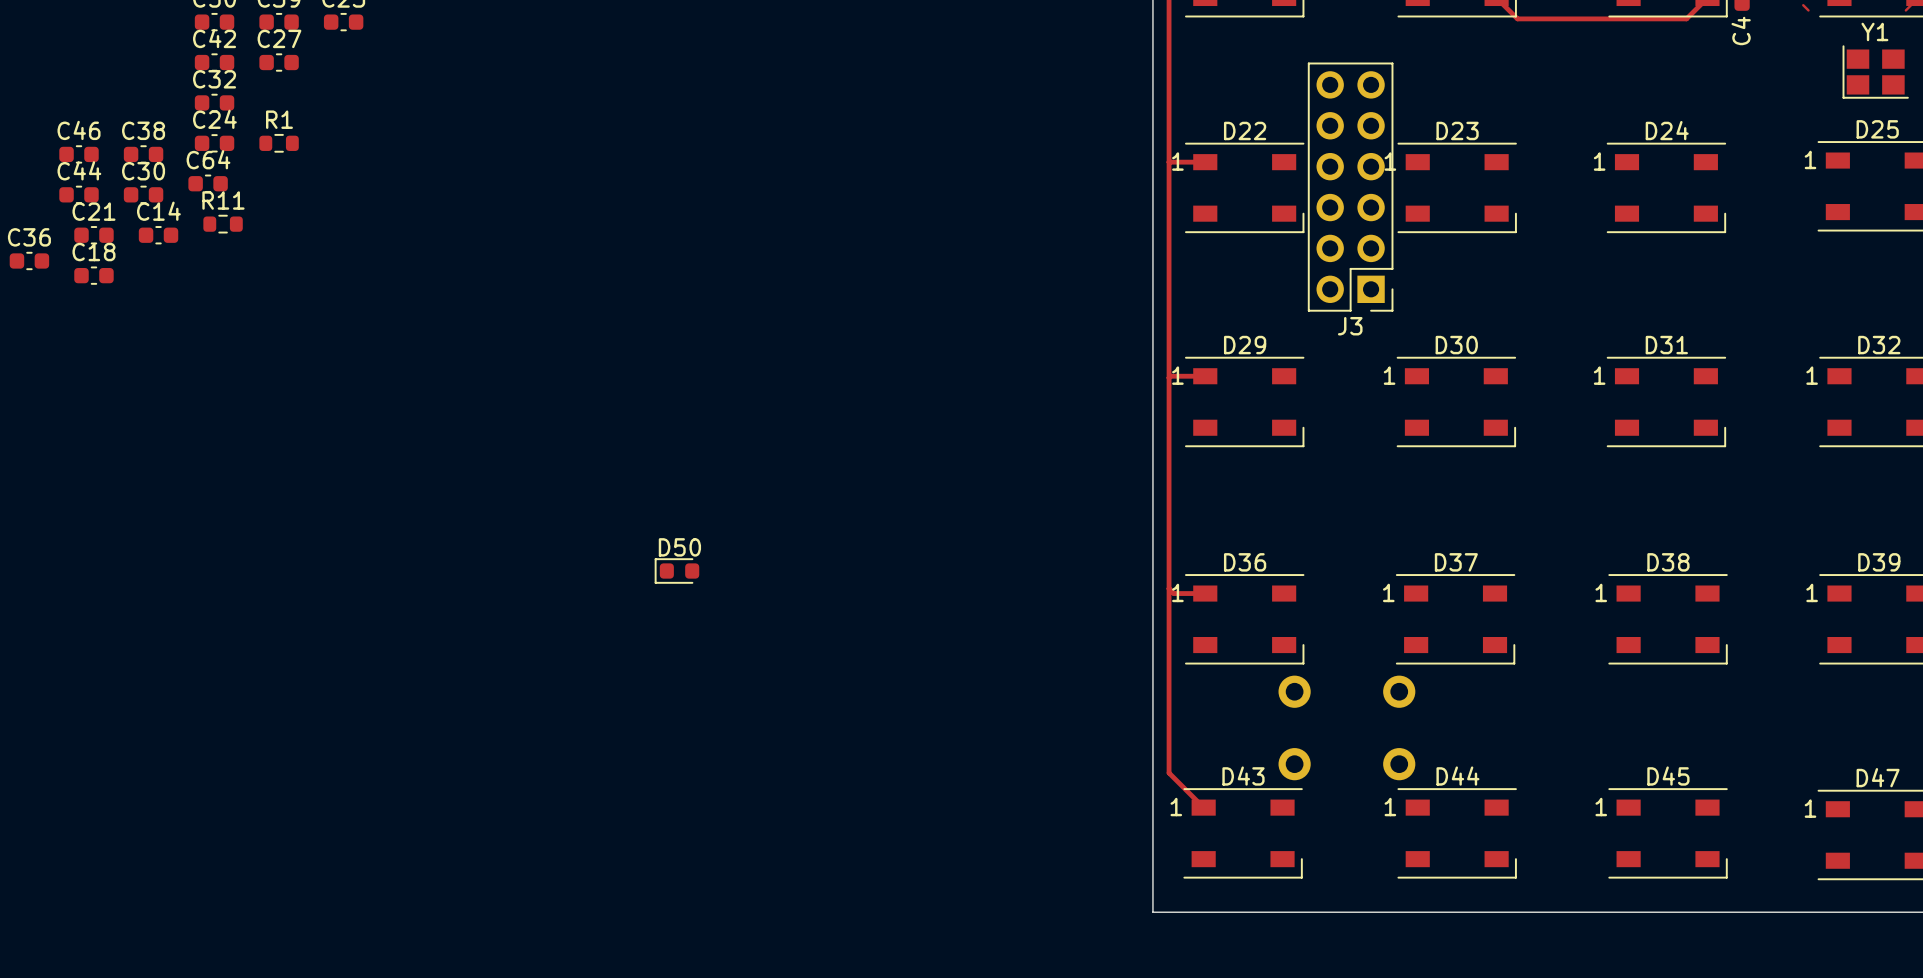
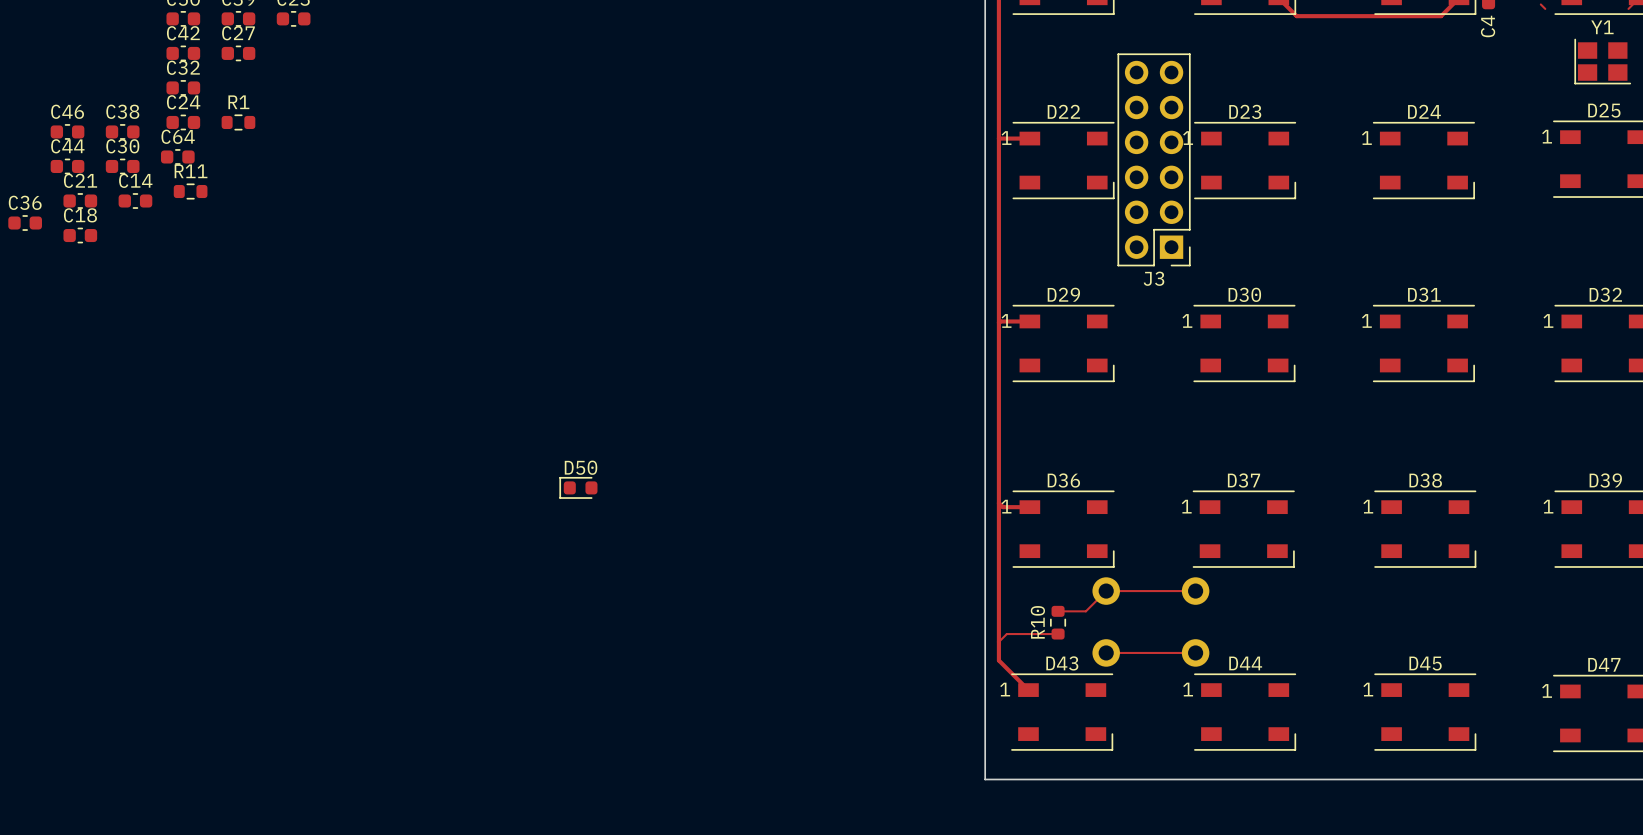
track: none -> (1195, 591) (1106, 591) (1085, 611) (1058, 611)
R10: none -> (1058, 622)
track: none -> (1058, 634) (1006, 634) (998, 641)
track: none -> (1106, 652) (1195, 652)

